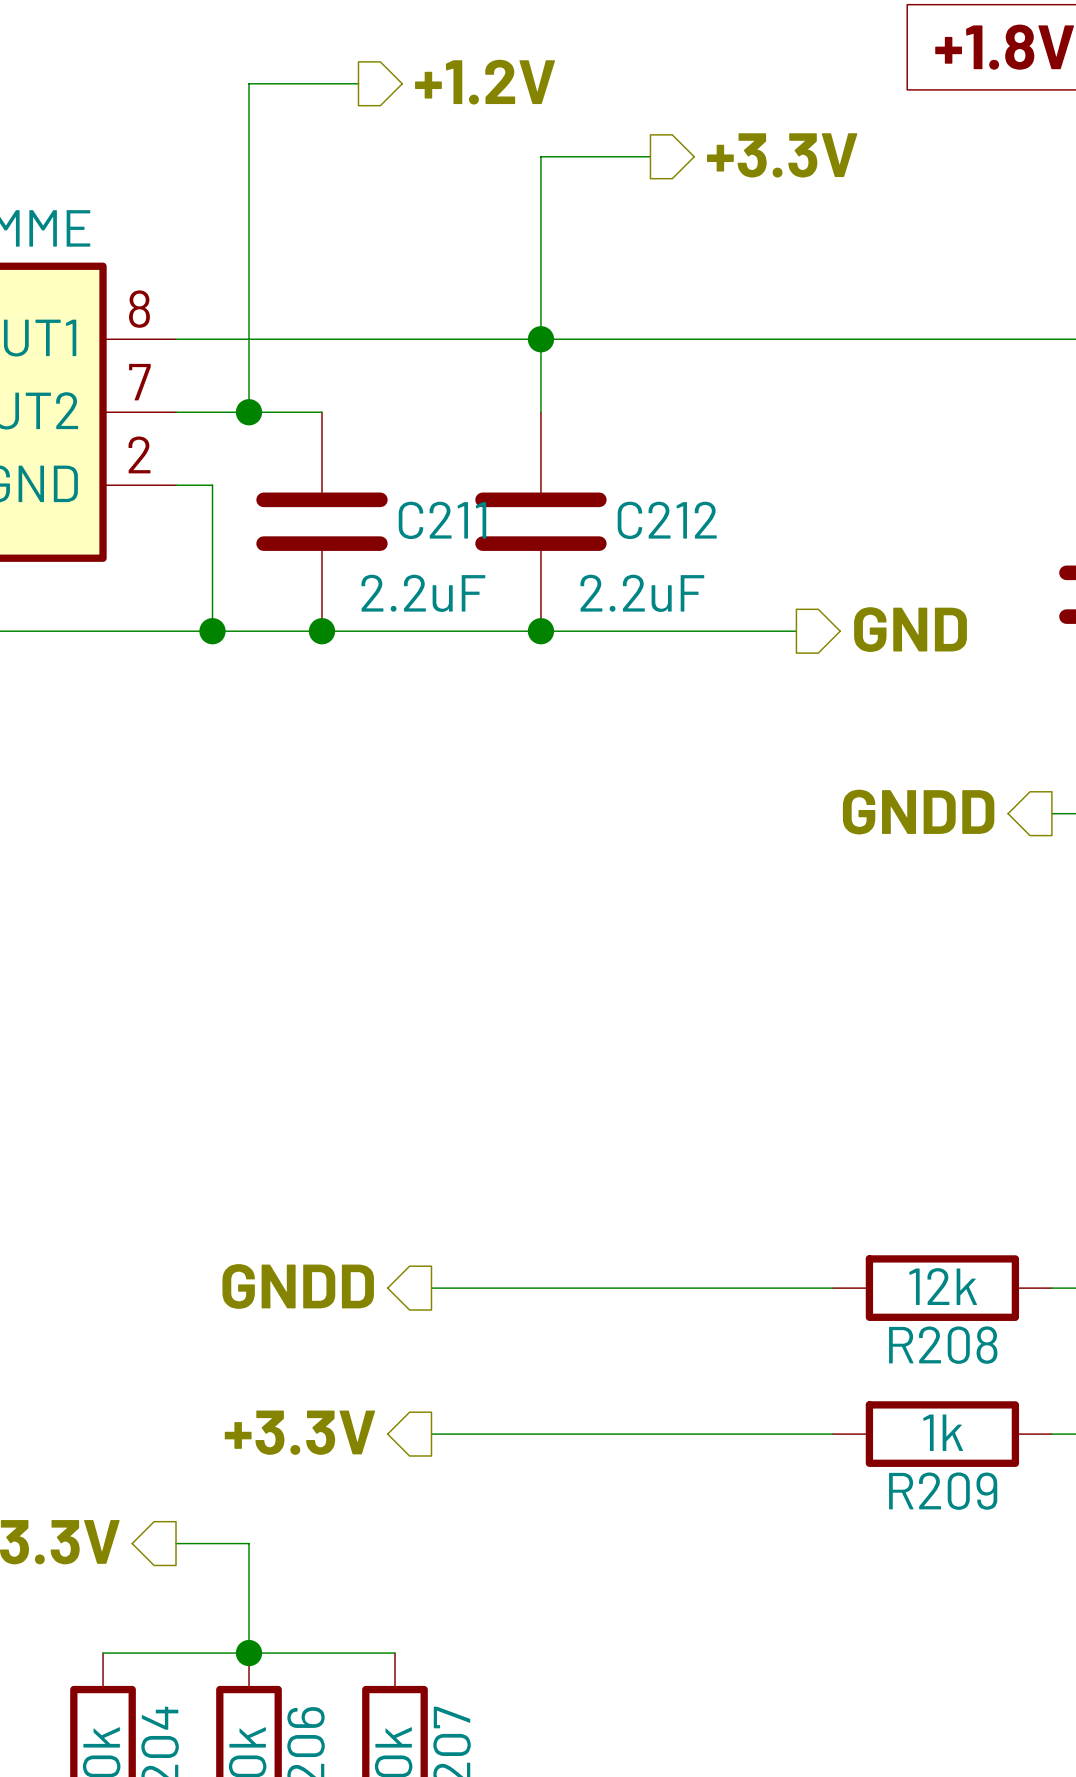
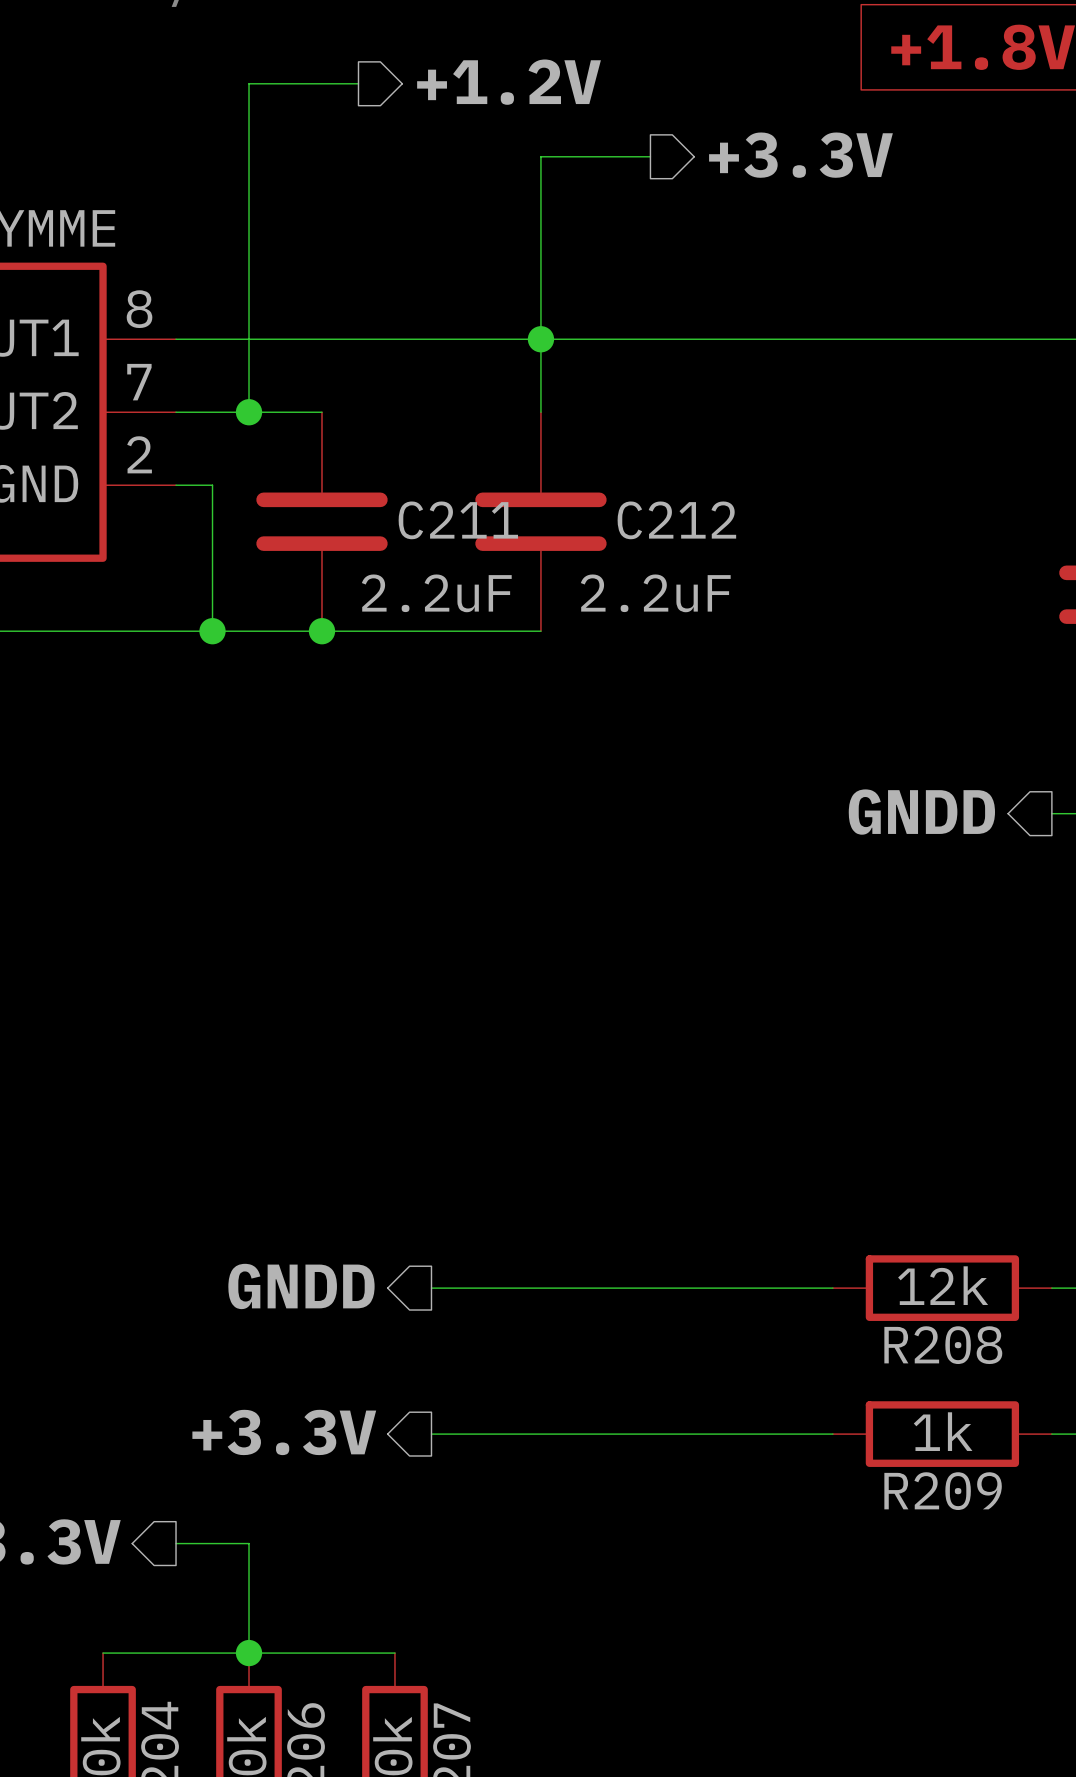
hierarchical label: GND (910, 629) -> none
wire: (540, 631) (796, 631) -> none
junction: (540, 631) -> none

